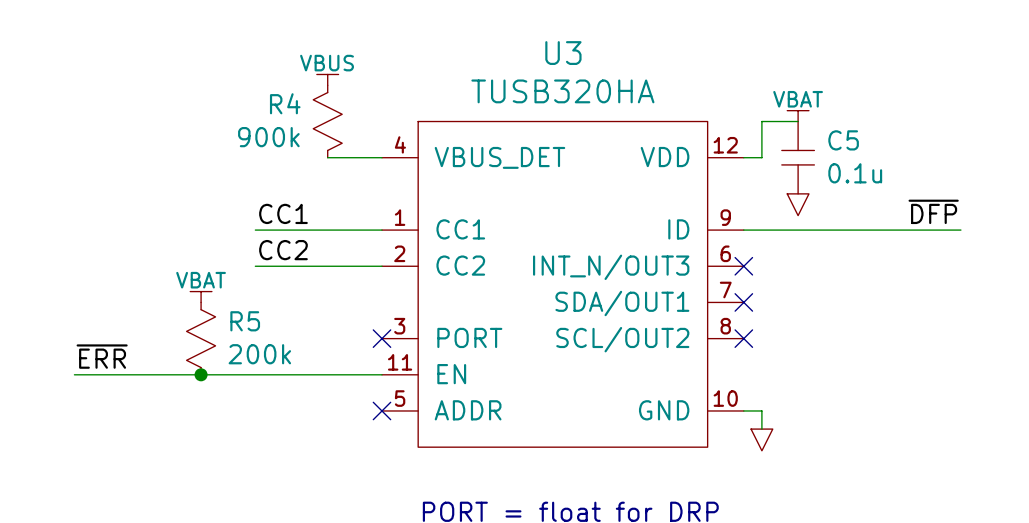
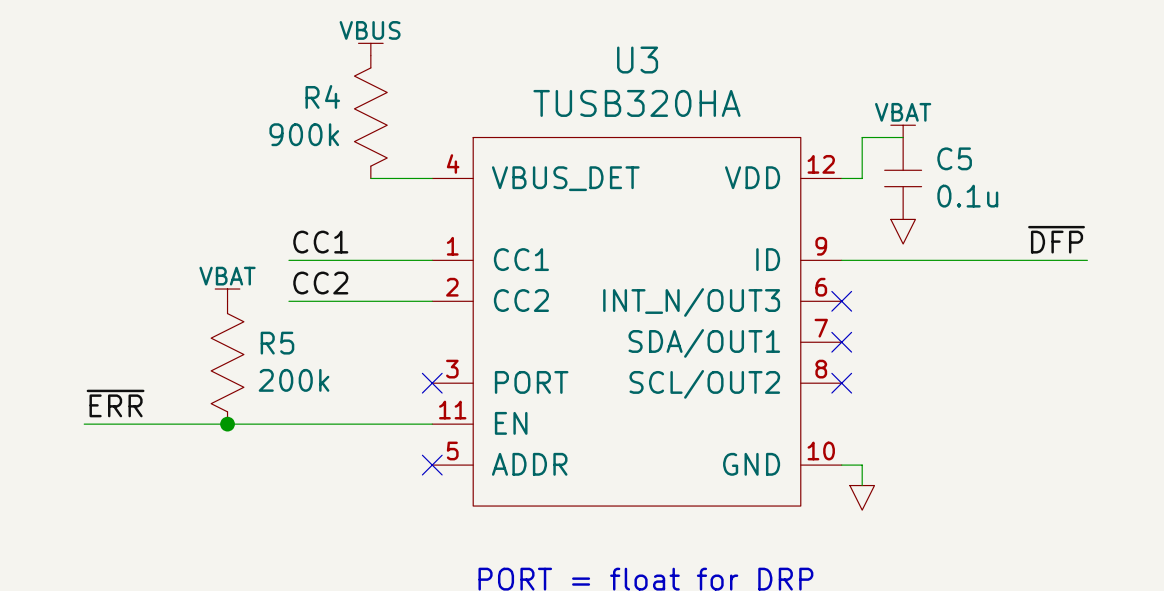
power symbol position: VBUS (327, 79) -> VBUS (370, 49)
R4 symbol: [313, 85, 343, 158] -> [354, 55, 388, 179]
power symbol position: VBAT (201, 297) -> VBAT (227, 295)
R5 symbol: [186, 302, 216, 375] -> [211, 301, 244, 425]

